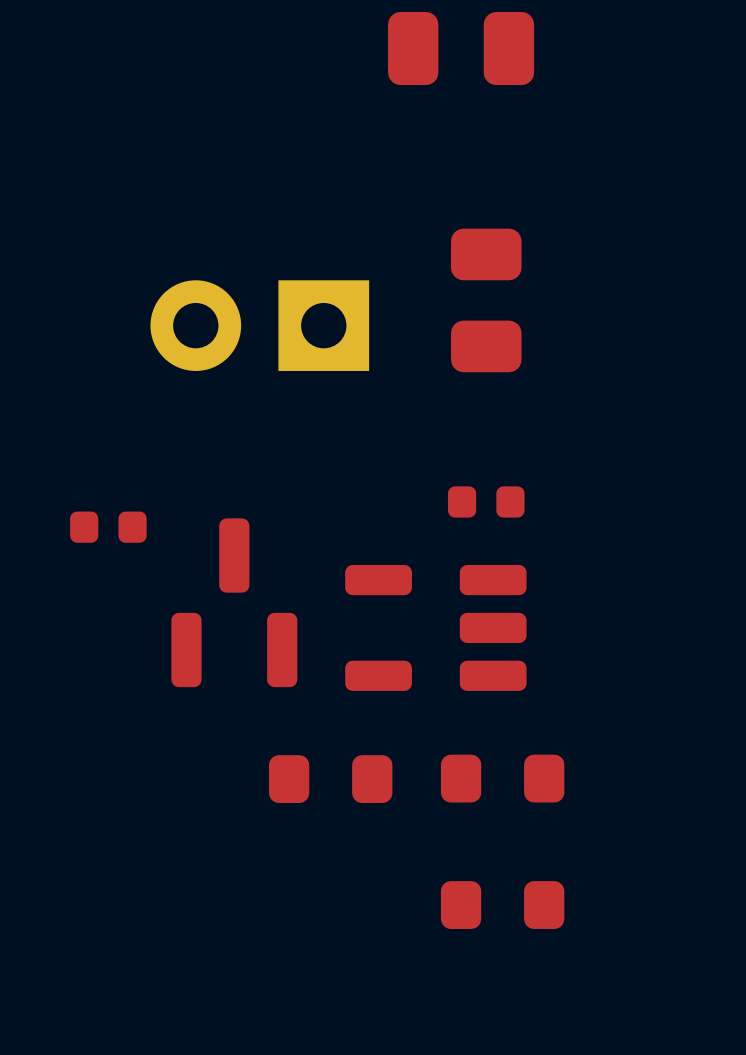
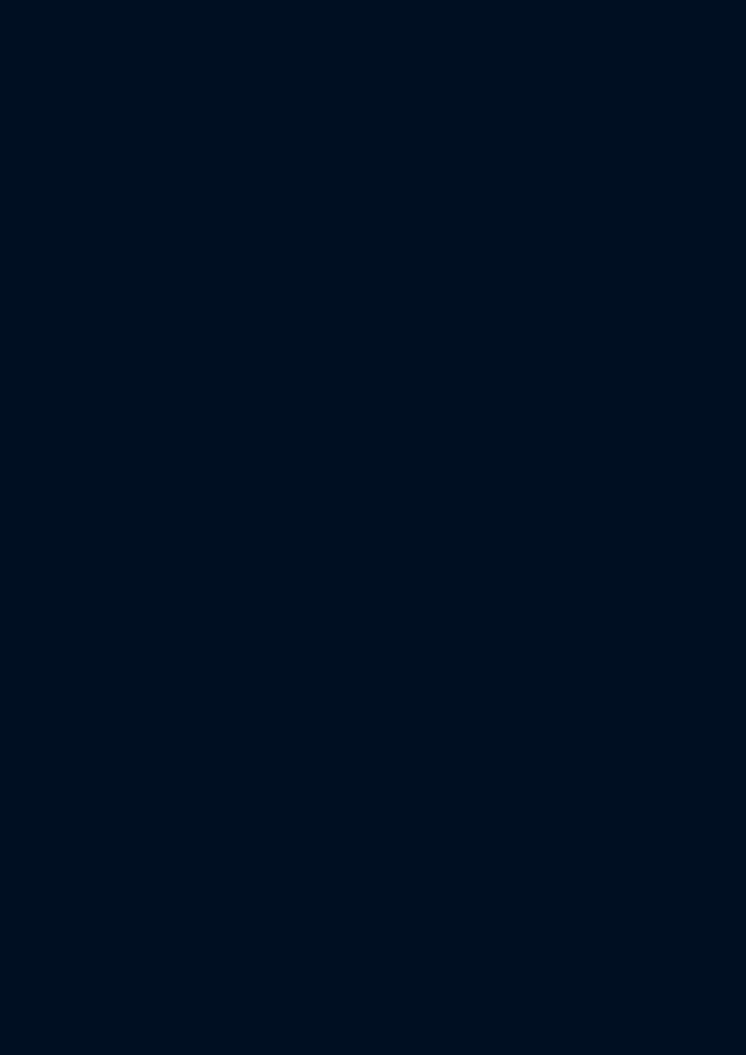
part: (461, 48) -> none
part: (486, 300) -> none
part: (259, 325) -> none
part: (486, 501) -> none
part: (108, 527) -> none
part: (234, 602) -> none
part: (435, 627) -> none
part: (502, 778) -> none
part: (330, 779) -> none
part: (502, 905) -> none

